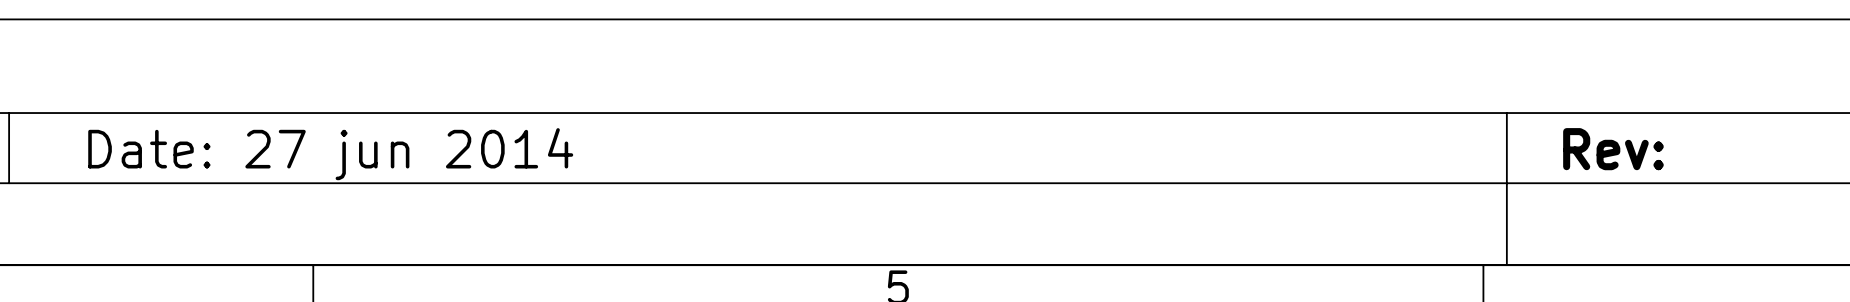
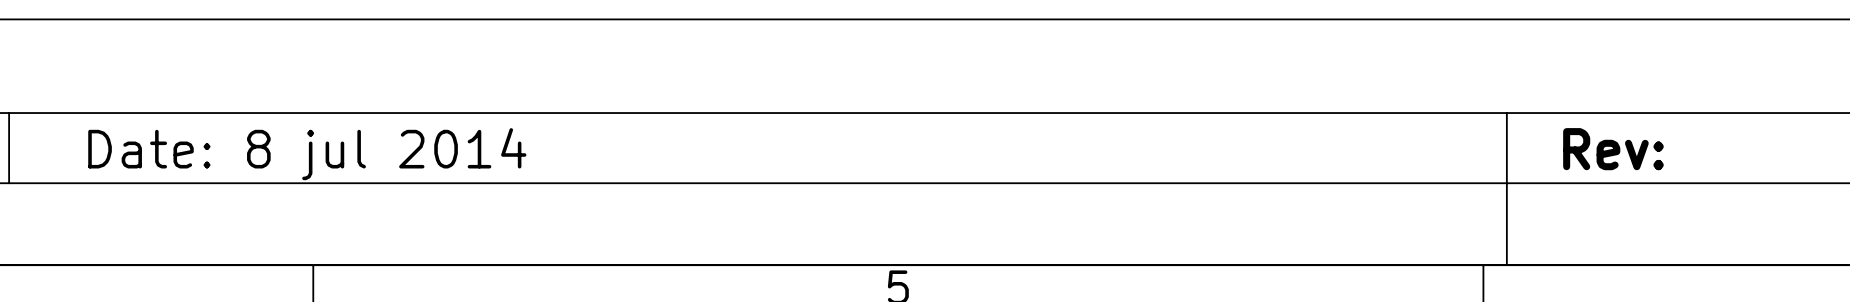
title block: Date: 27 jun 2014 (330, 154) -> Date: 8 jul 2014 (307, 154)

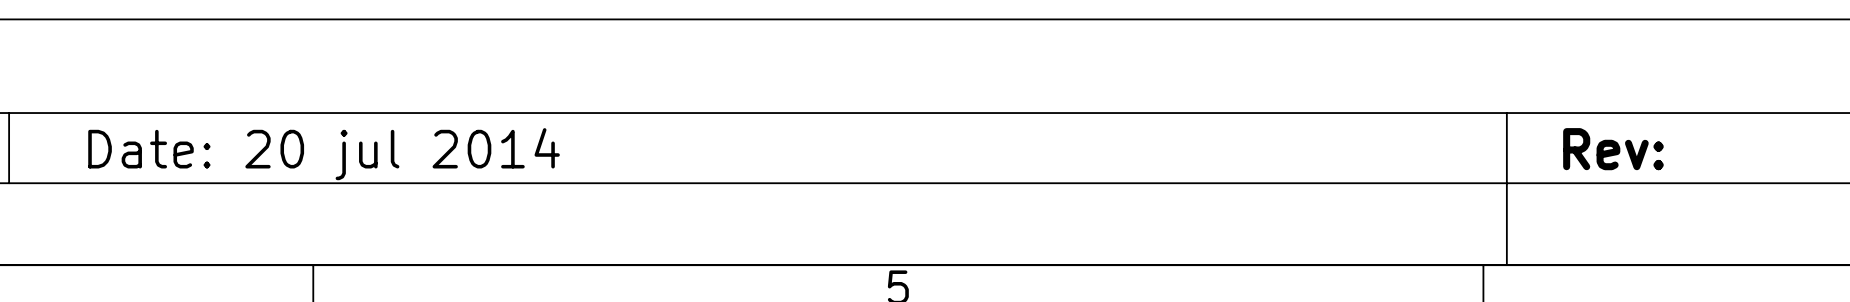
title block: Date: 8 jul 2014 (307, 154) -> Date: 20 jul 2014 (324, 154)

